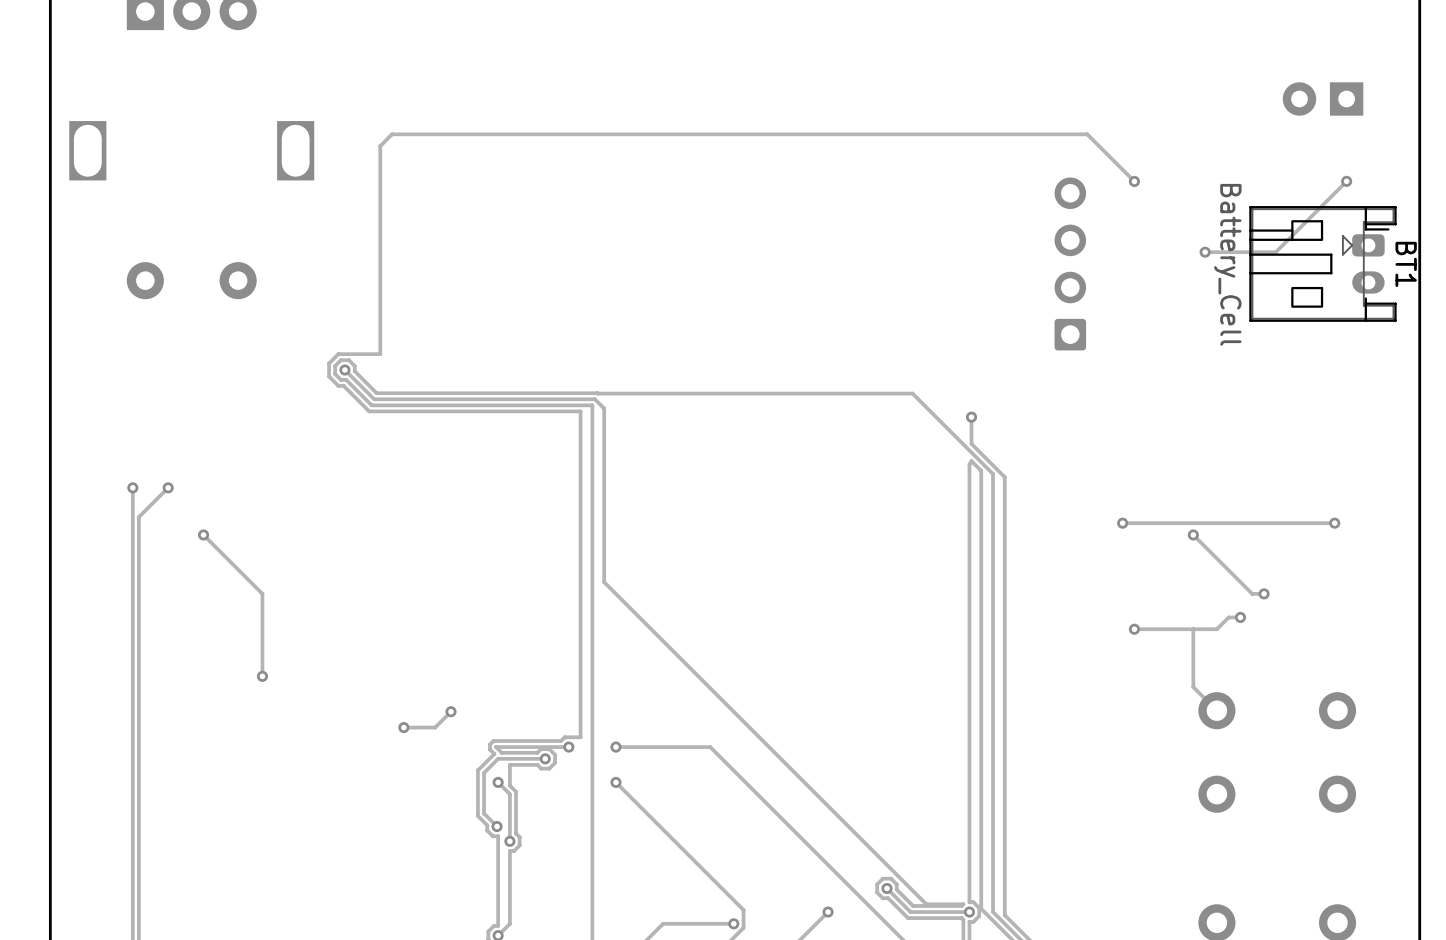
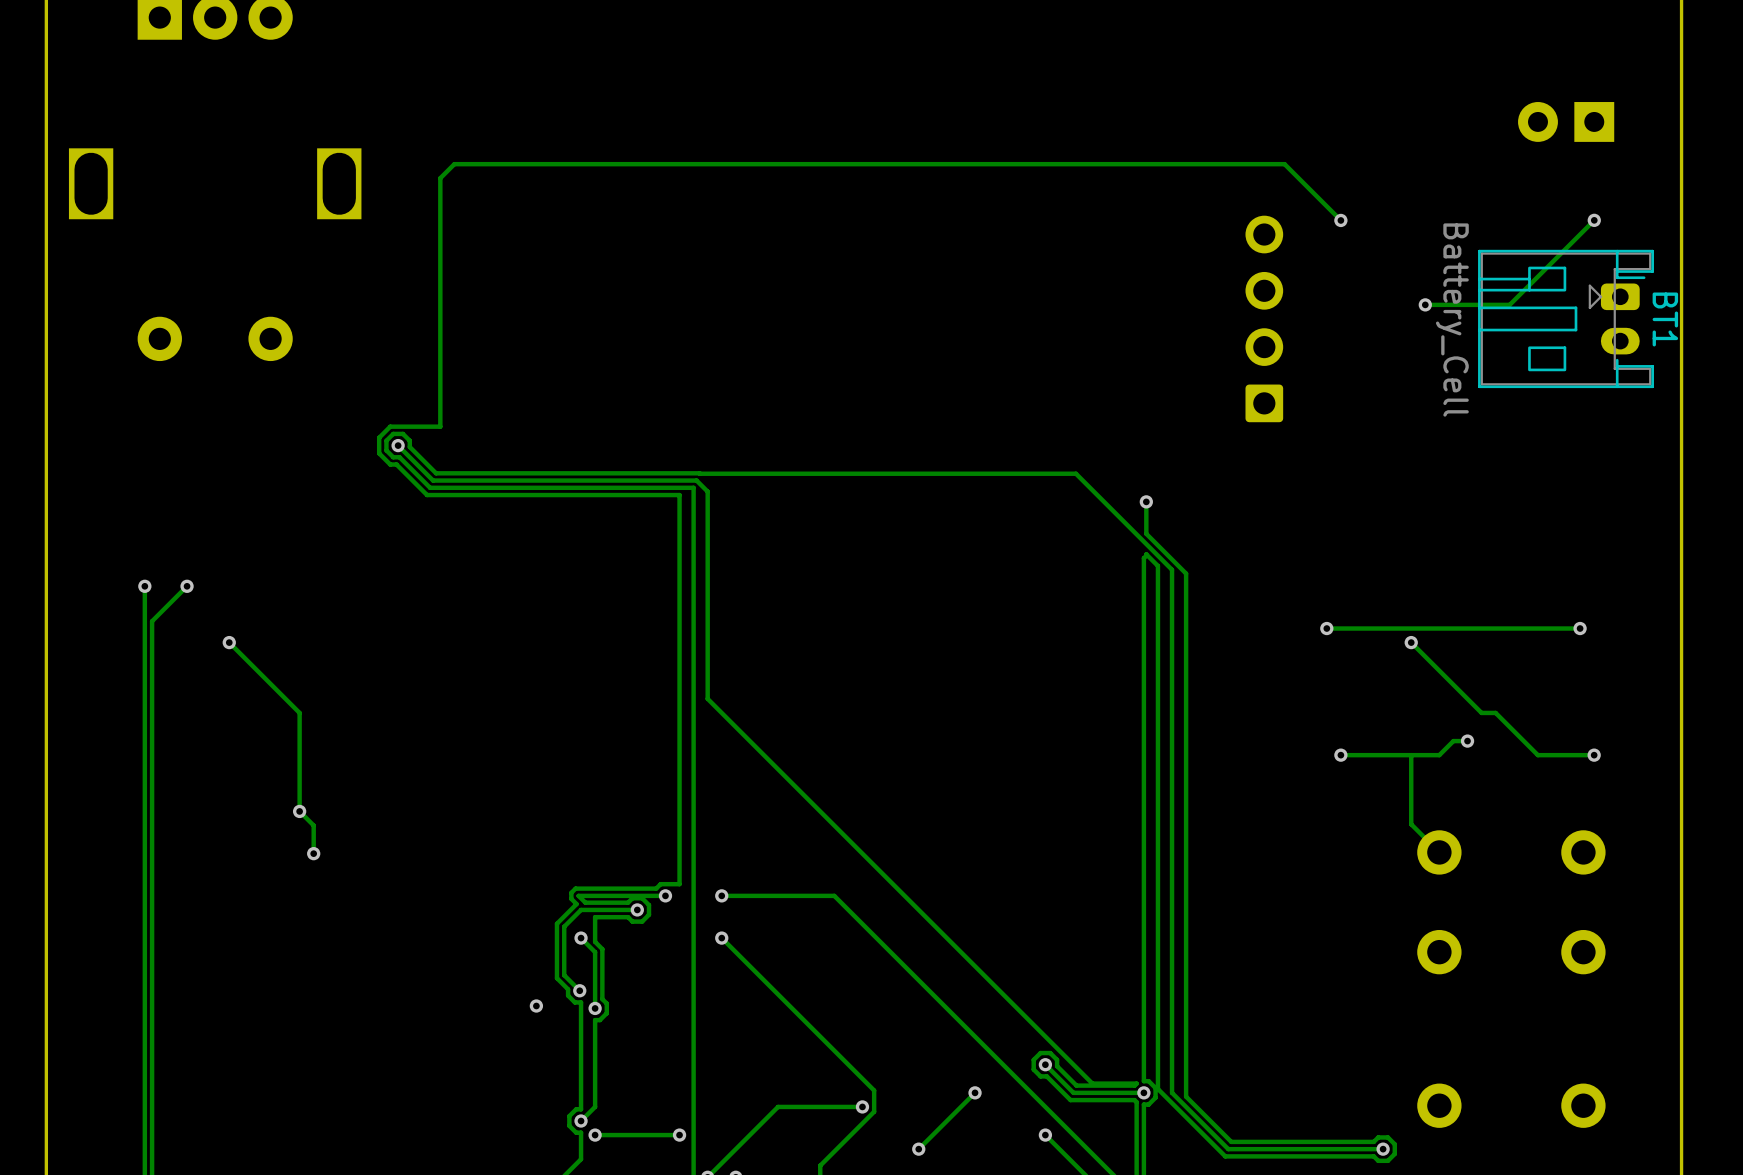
track: none -> (1495, 712) (1537, 755) (1594, 755)
via position: (1264, 593) -> (1594, 755)
track: none -> (299, 811) (313, 825) (313, 853)
via: none -> (313, 853)
track: (450, 711) (435, 727) (403, 727) -> none
via: (450, 711) -> none
via: (403, 727) -> none
via: none -> (536, 1006)

